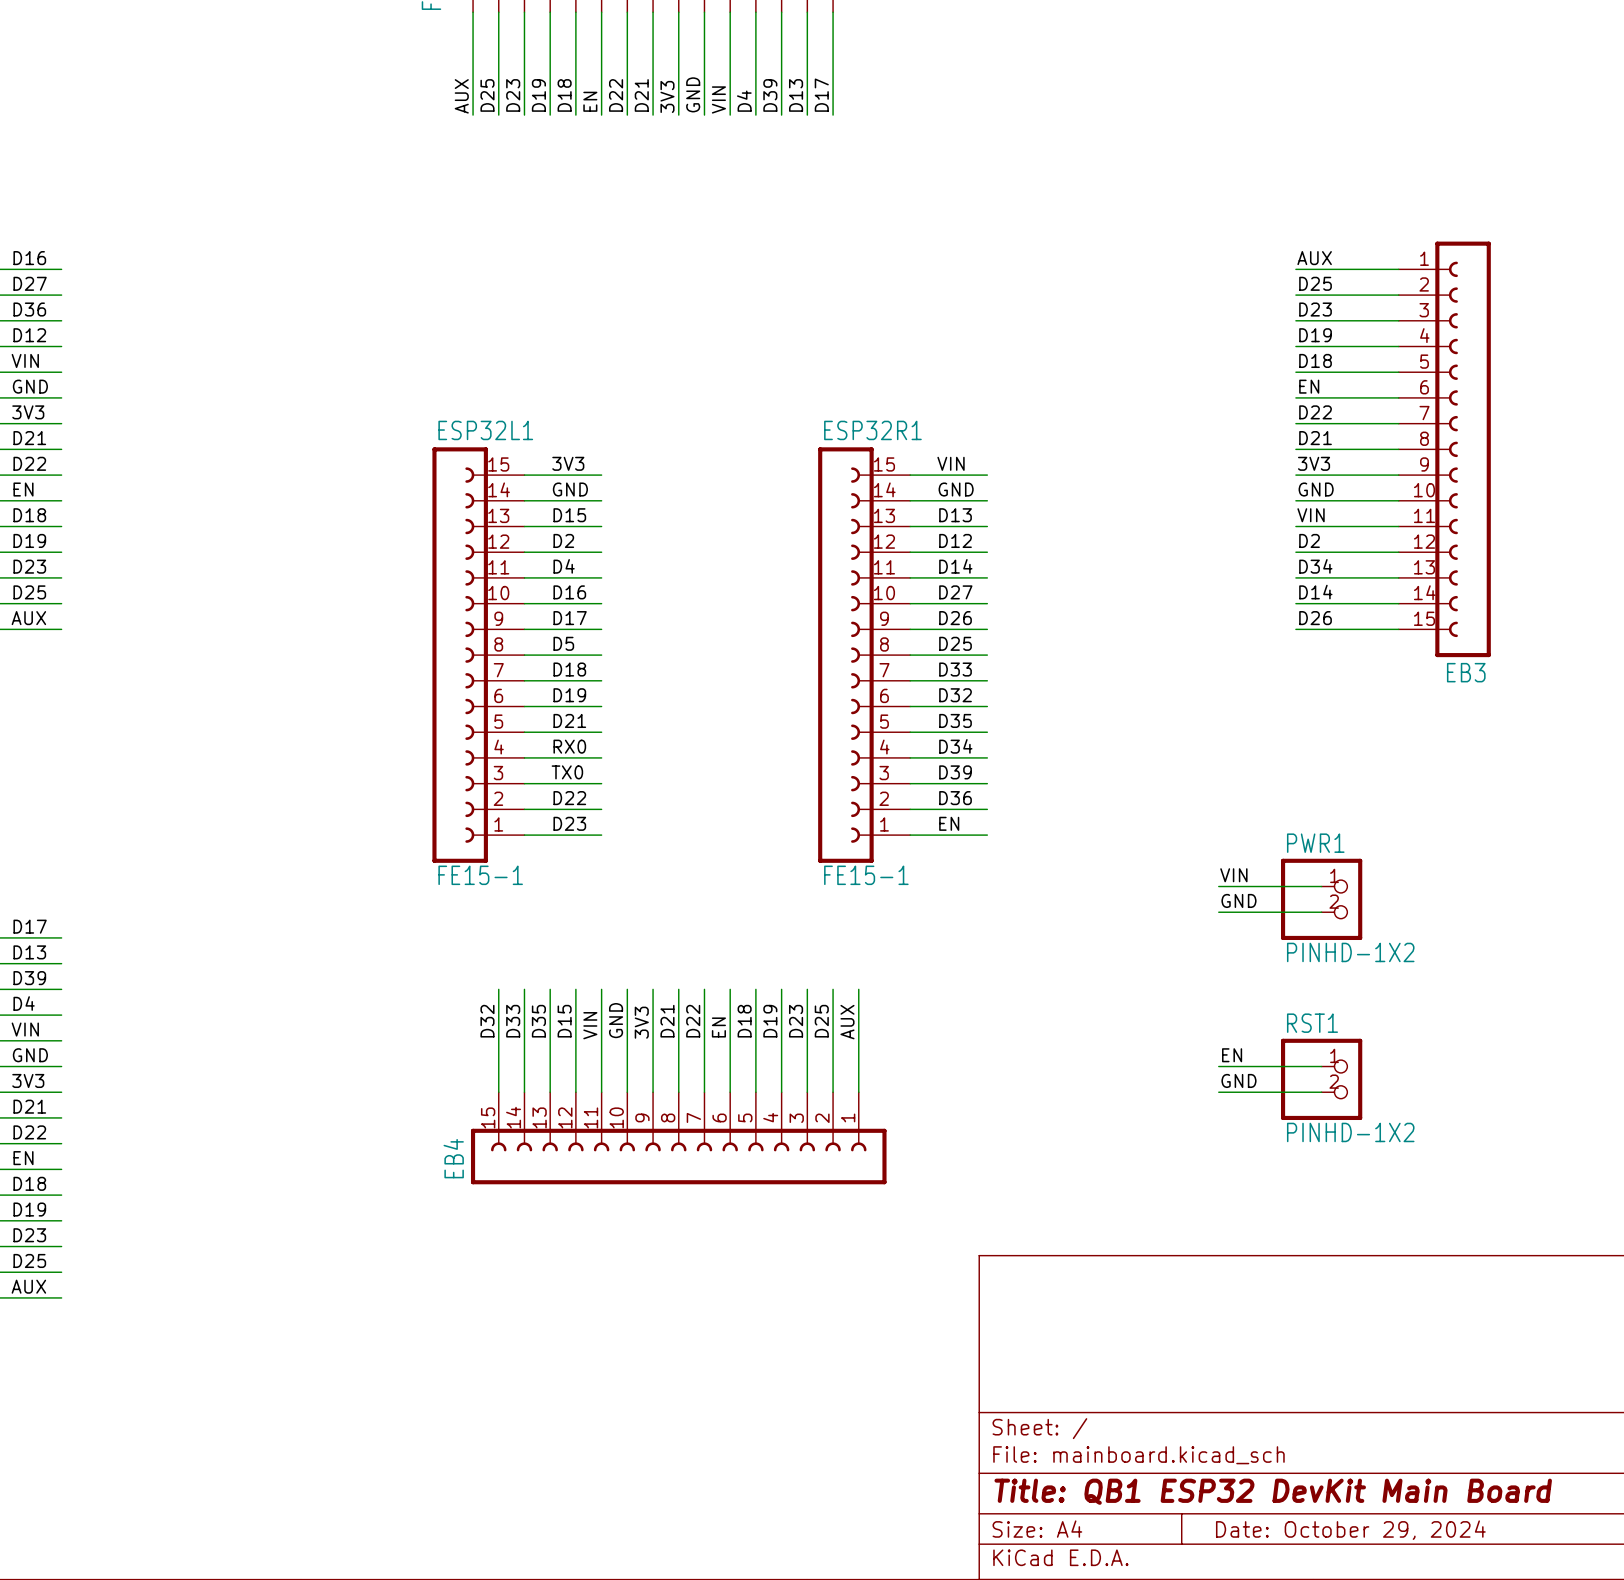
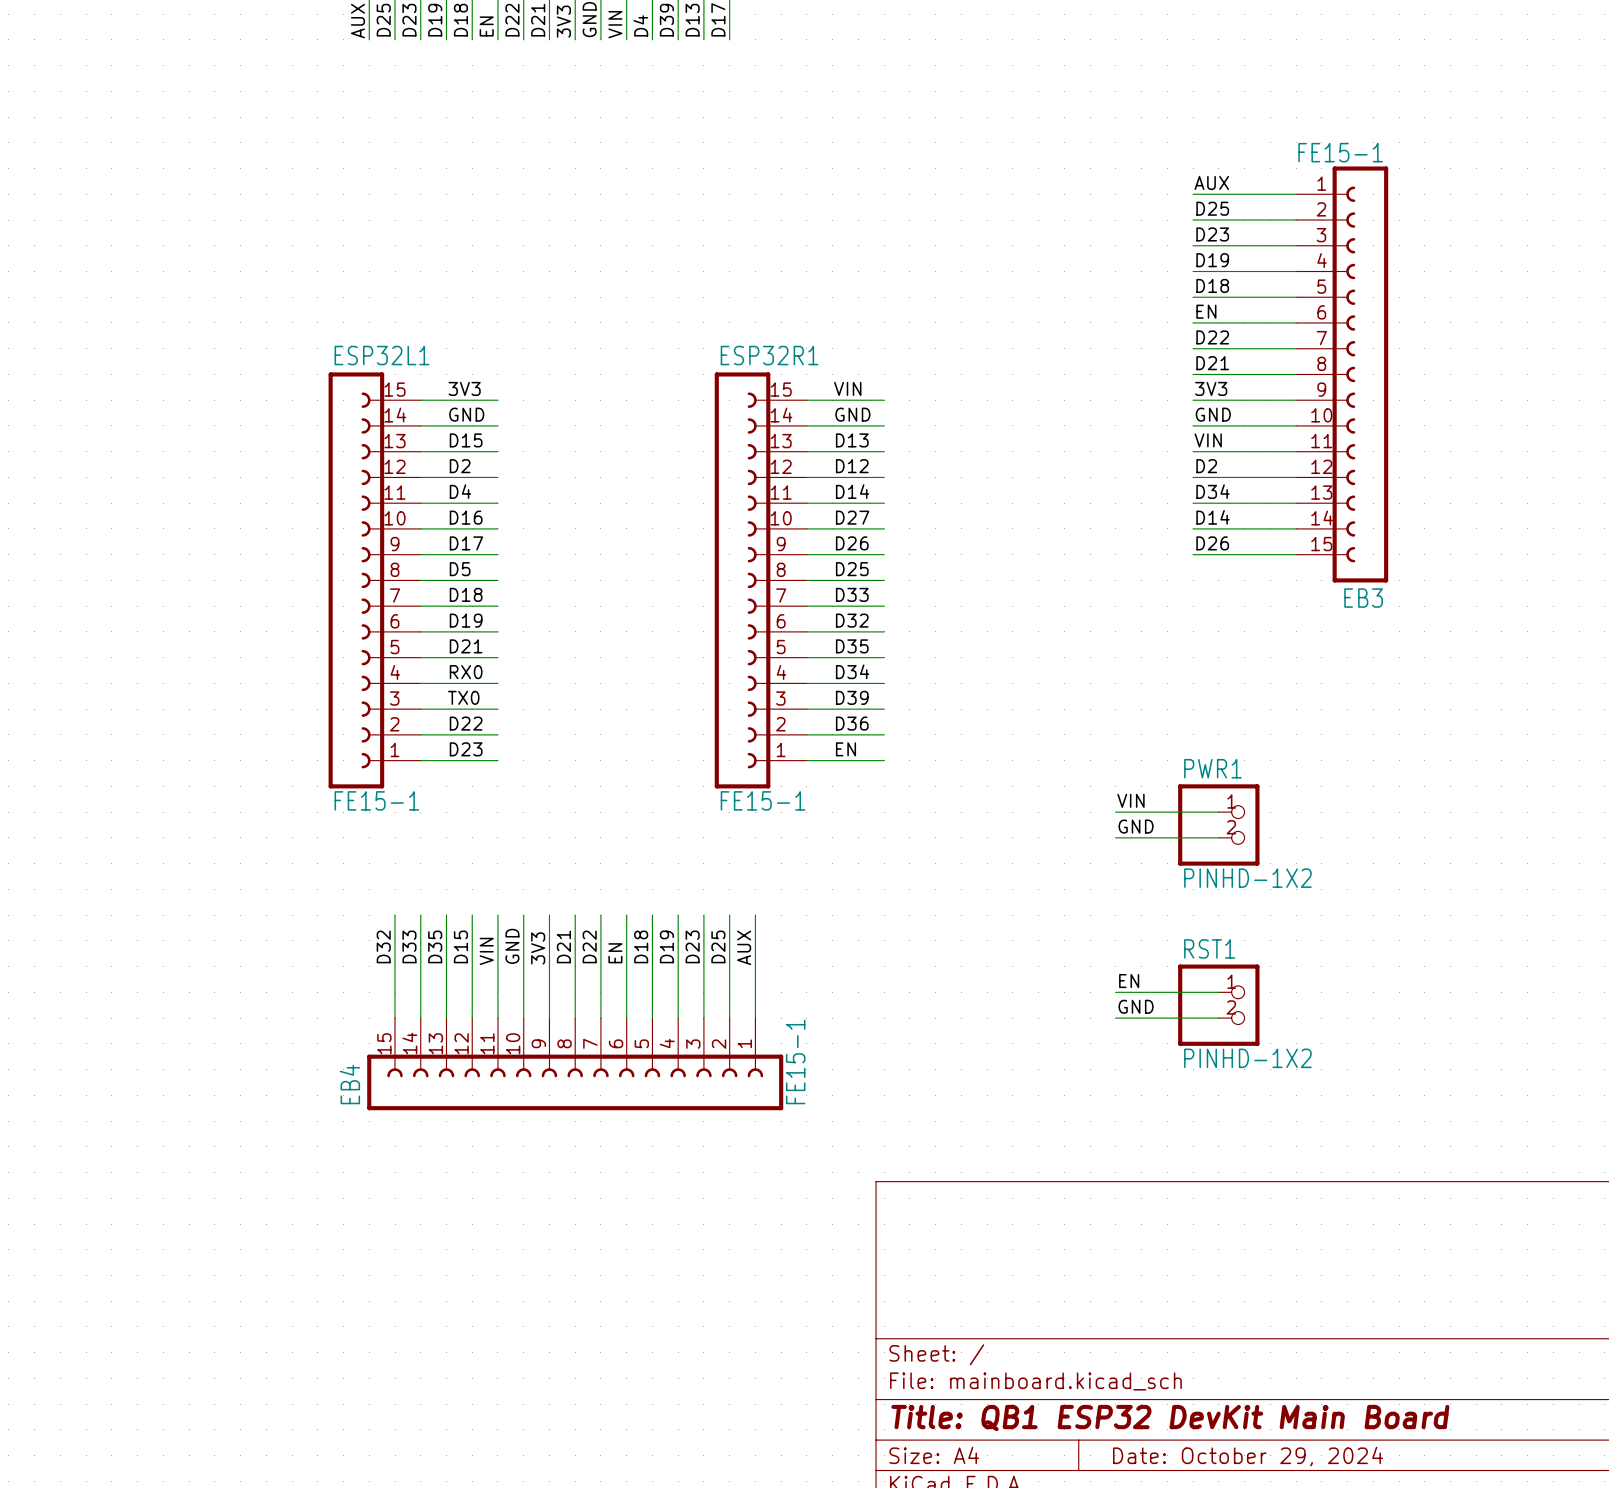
EB3 value: none -> FE15-1 (1340, 152)
EB4 value: none -> FE15-1 (795, 1061)

